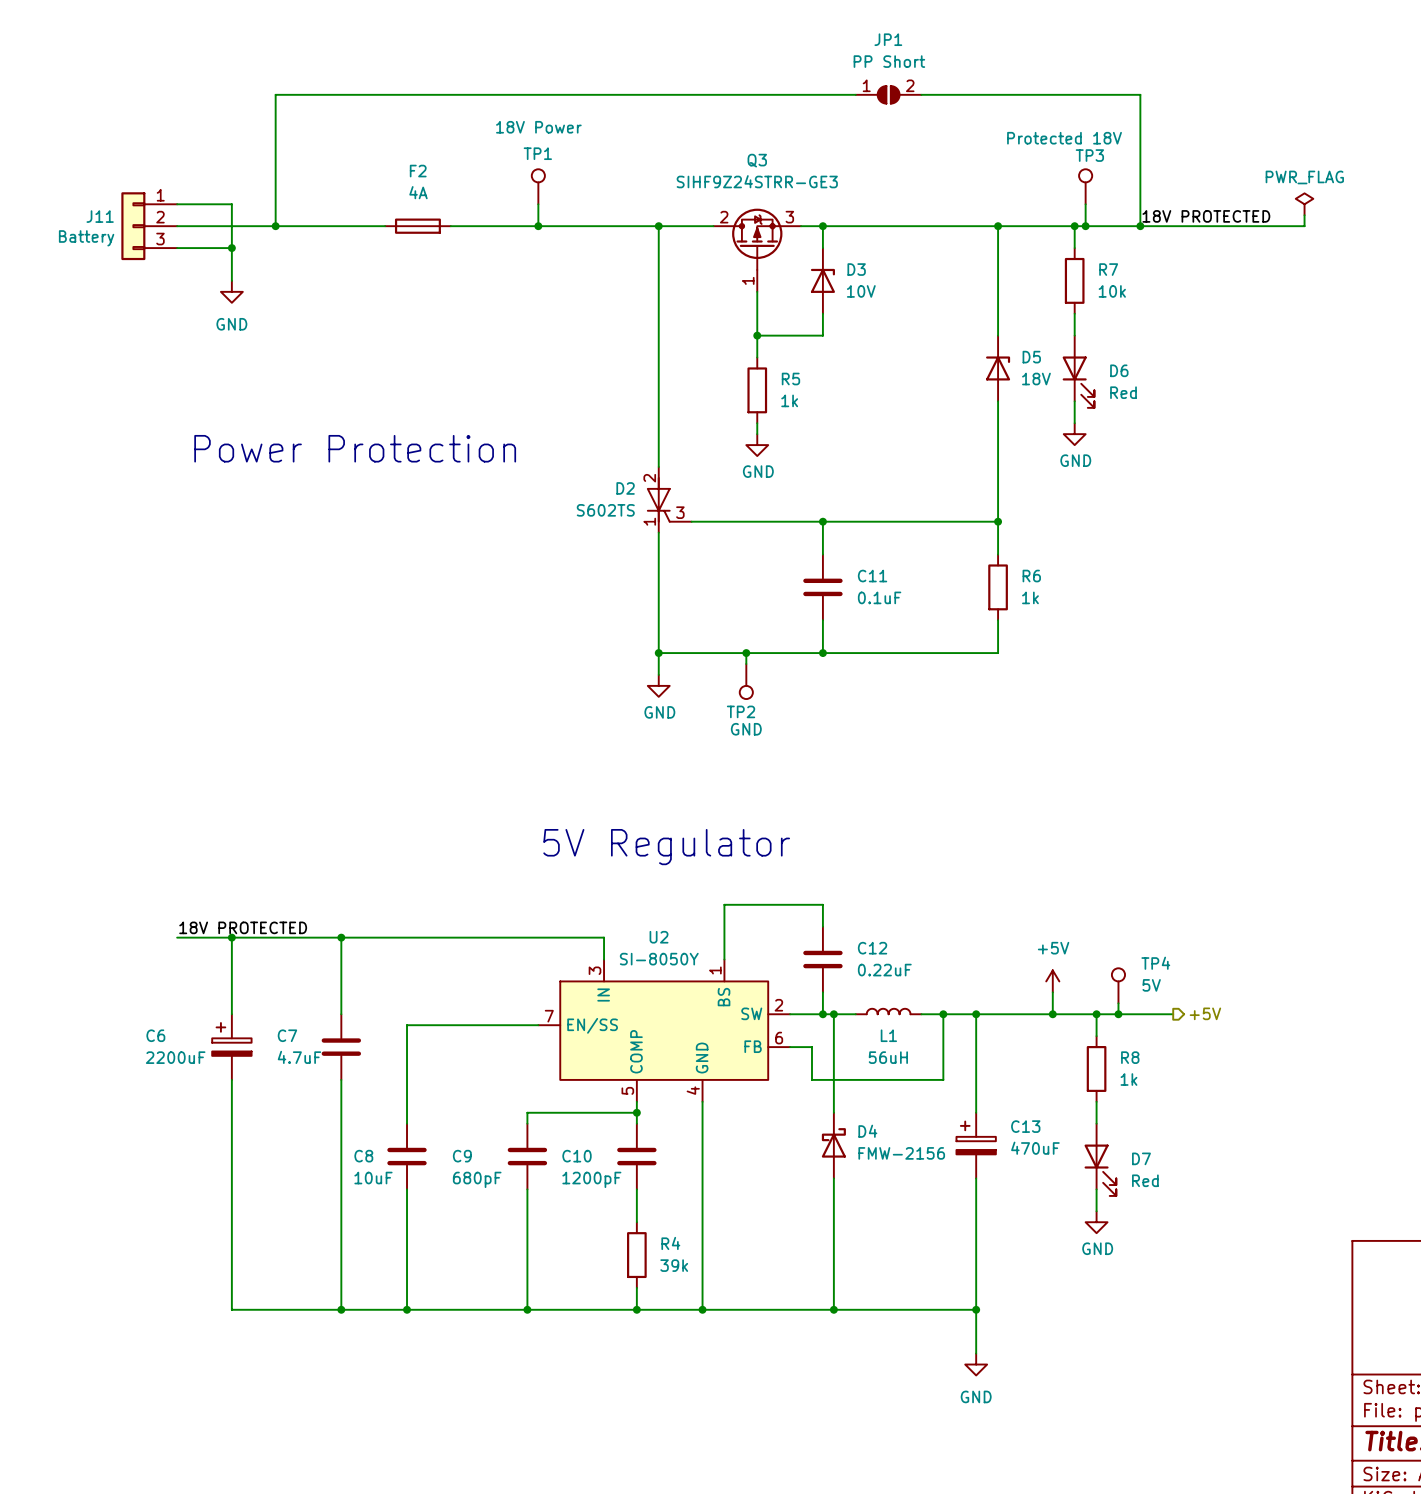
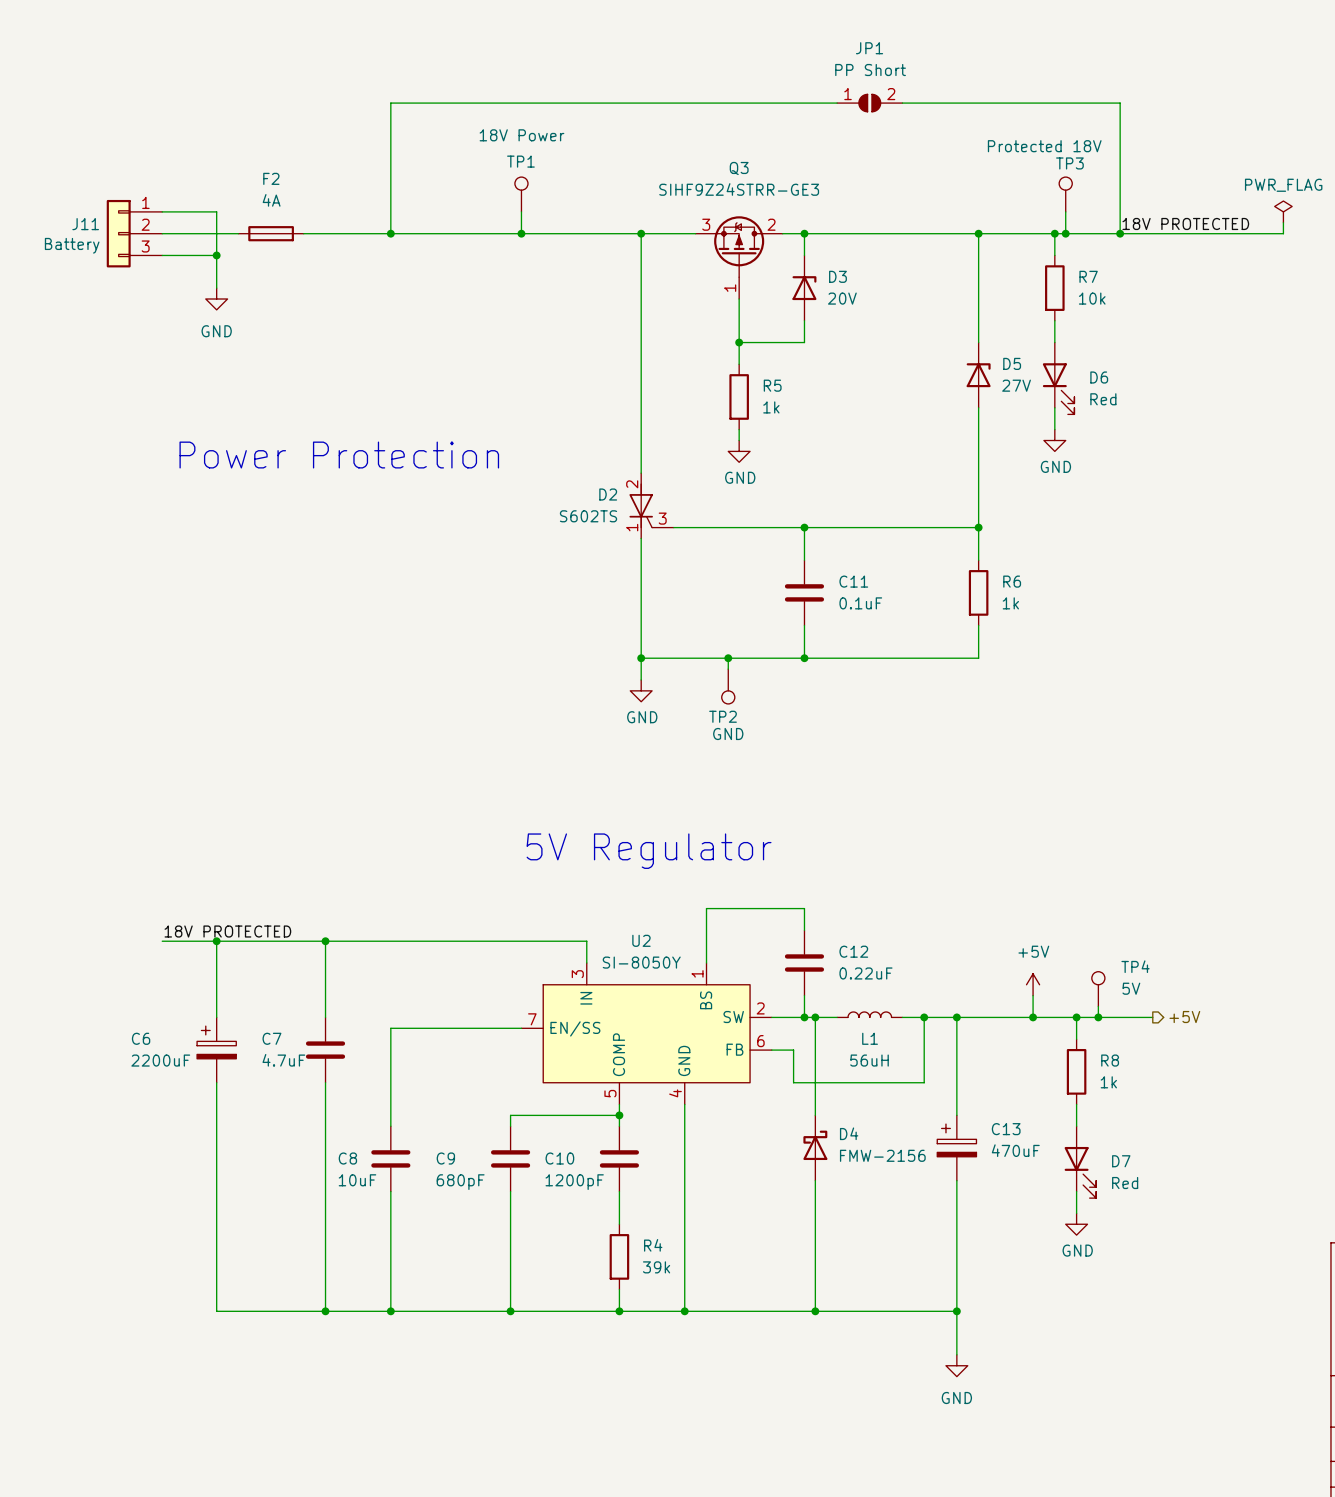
wire: (407, 94) (275, 94) (275, 226) -> (390, 103) (390, 233)
junction: (275, 226) -> none
junction: none -> (390, 233)
F2 position: (417, 226) -> (271, 233)
Q3 flip: as is (757, 239) -> left-right (739, 246)
D3 value: 10V (861, 291) -> 20V (842, 298)
D5 value: 18V (1036, 379) -> 27V (1016, 385)

